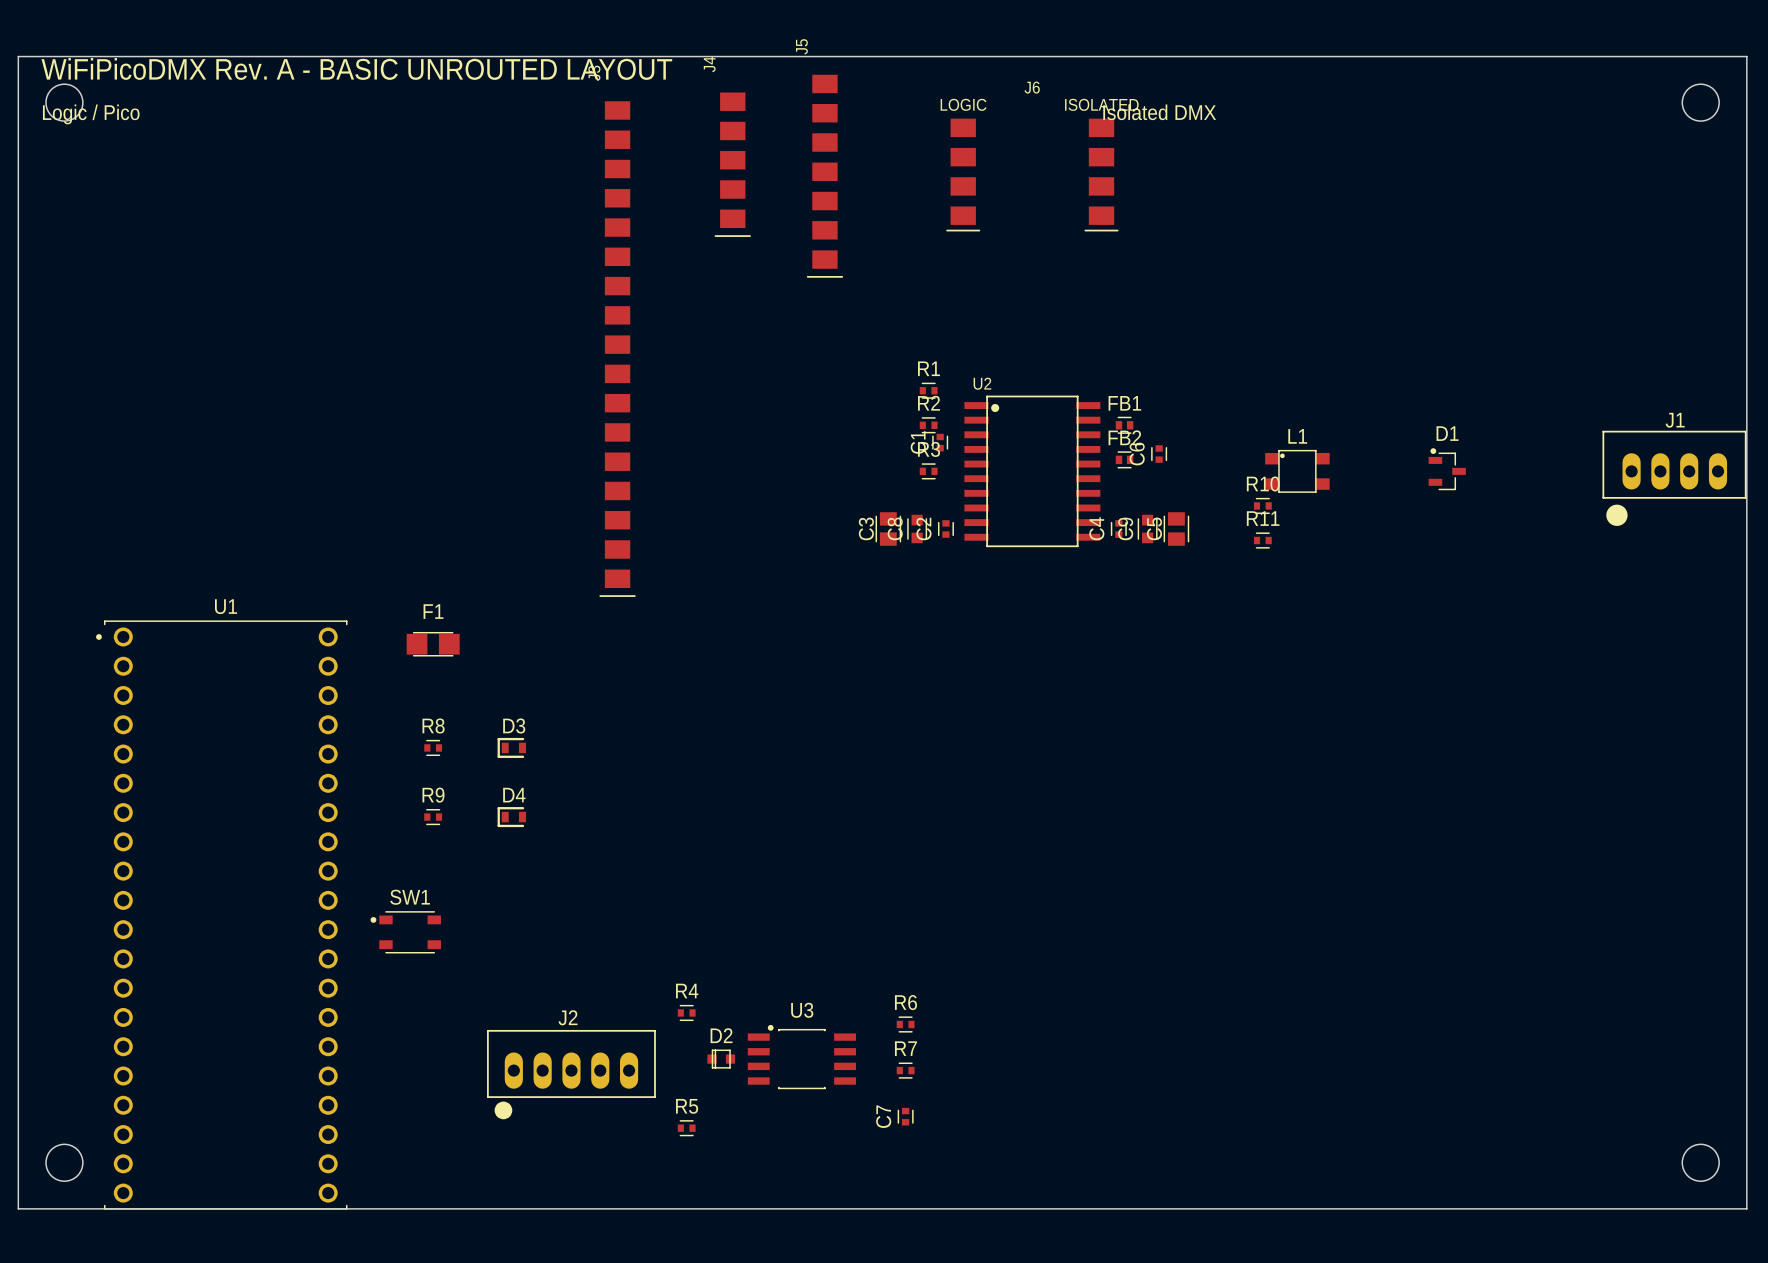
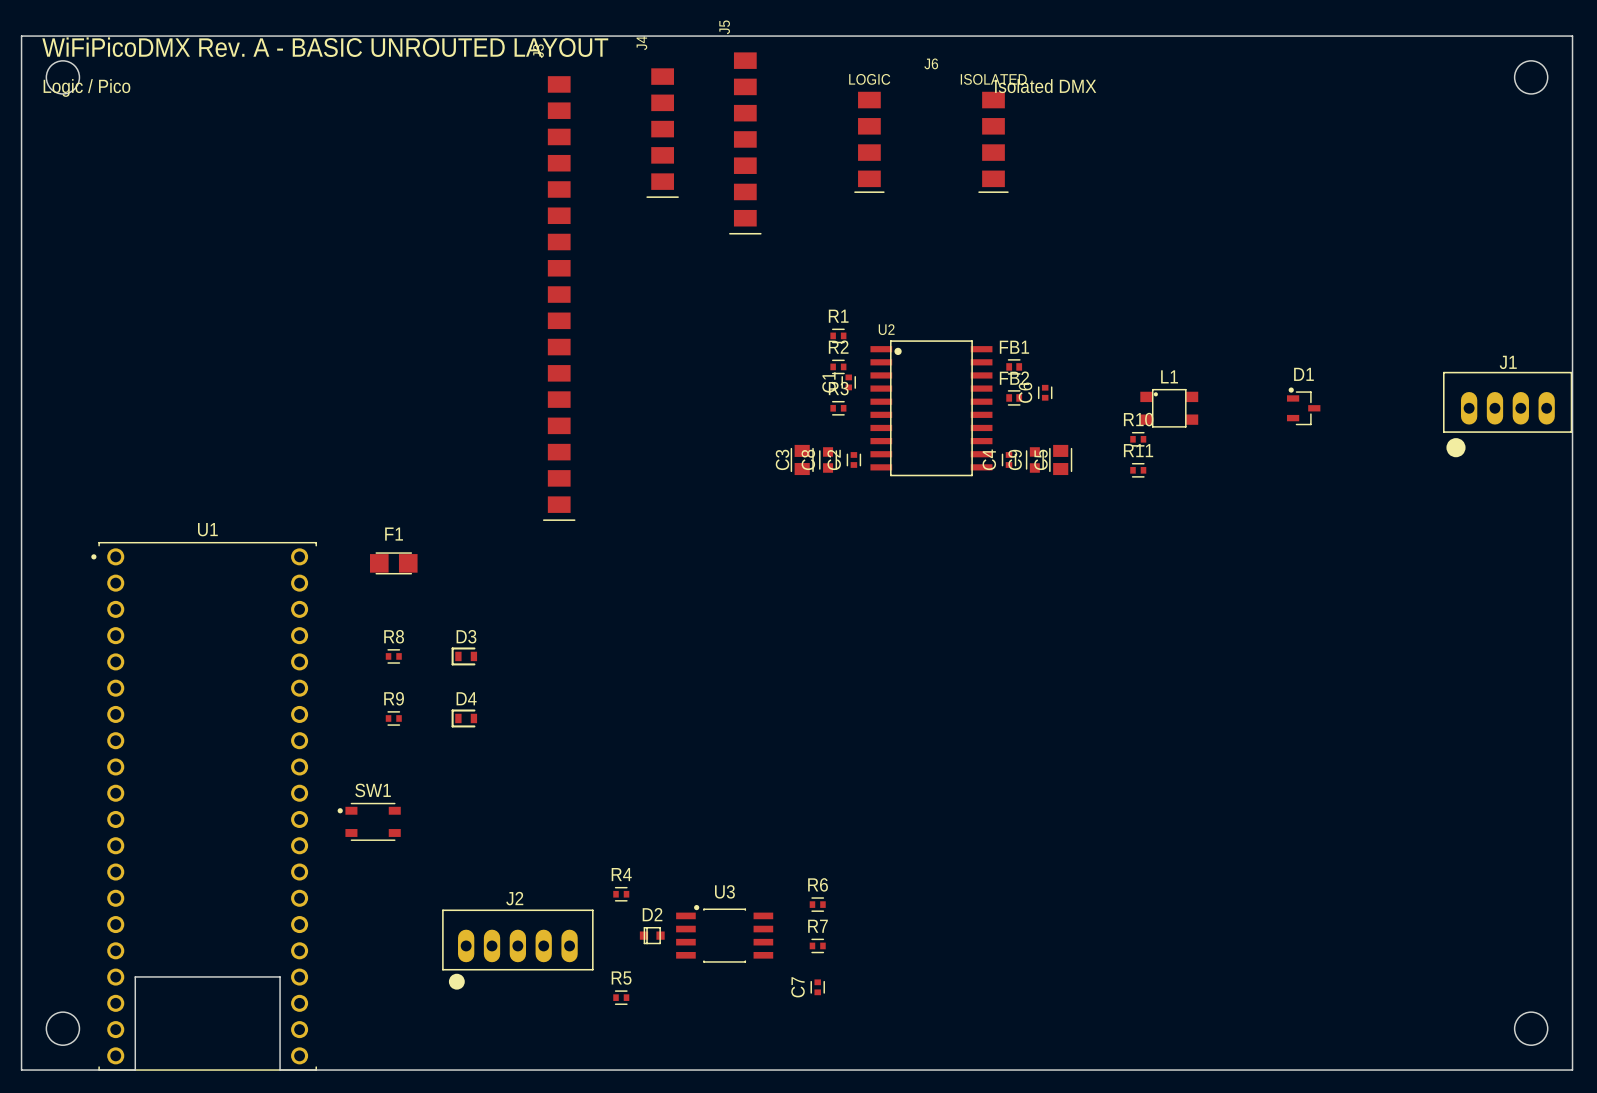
board edge: (145, 1208) (306, 1208) -> (135, 1070) (135, 976) (280, 976) (280, 1070)

